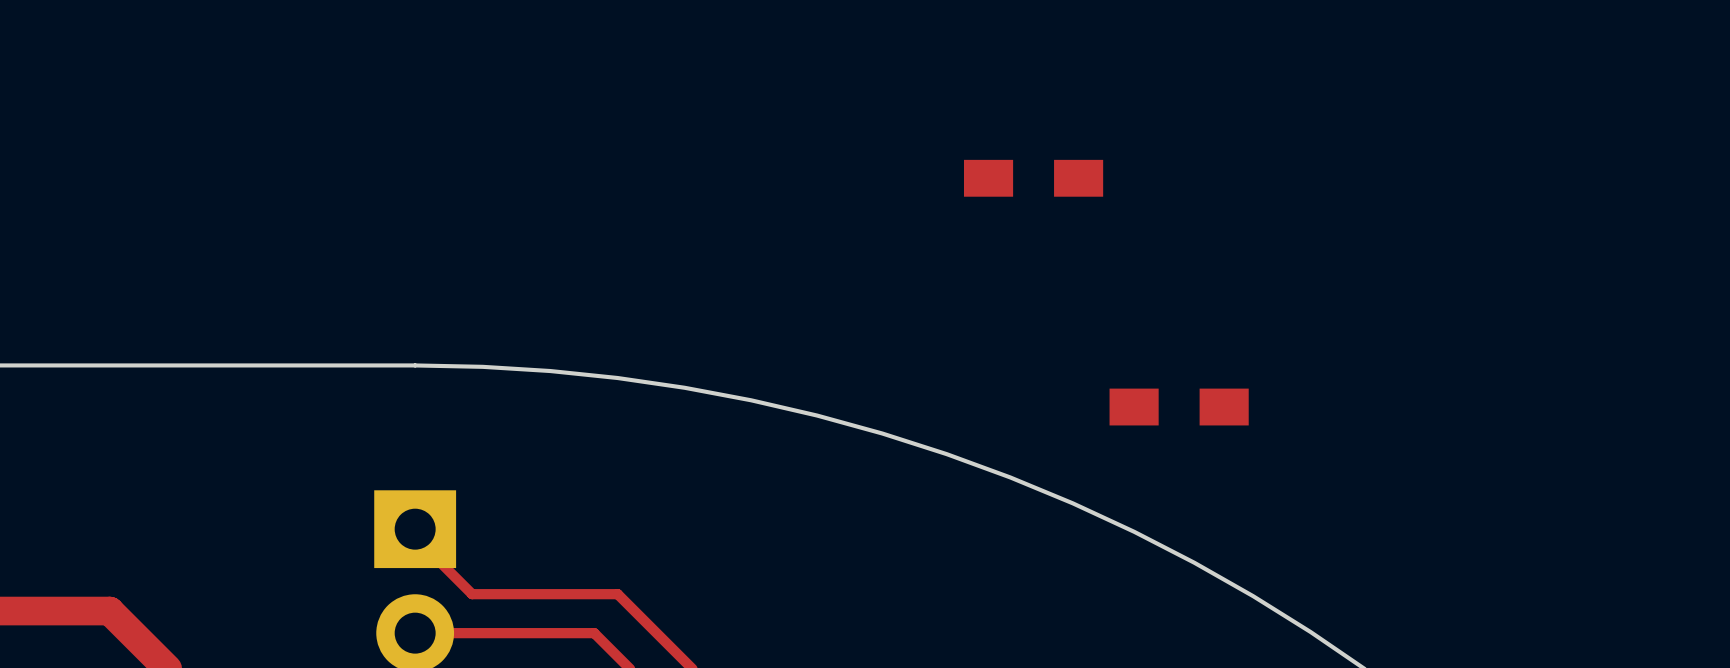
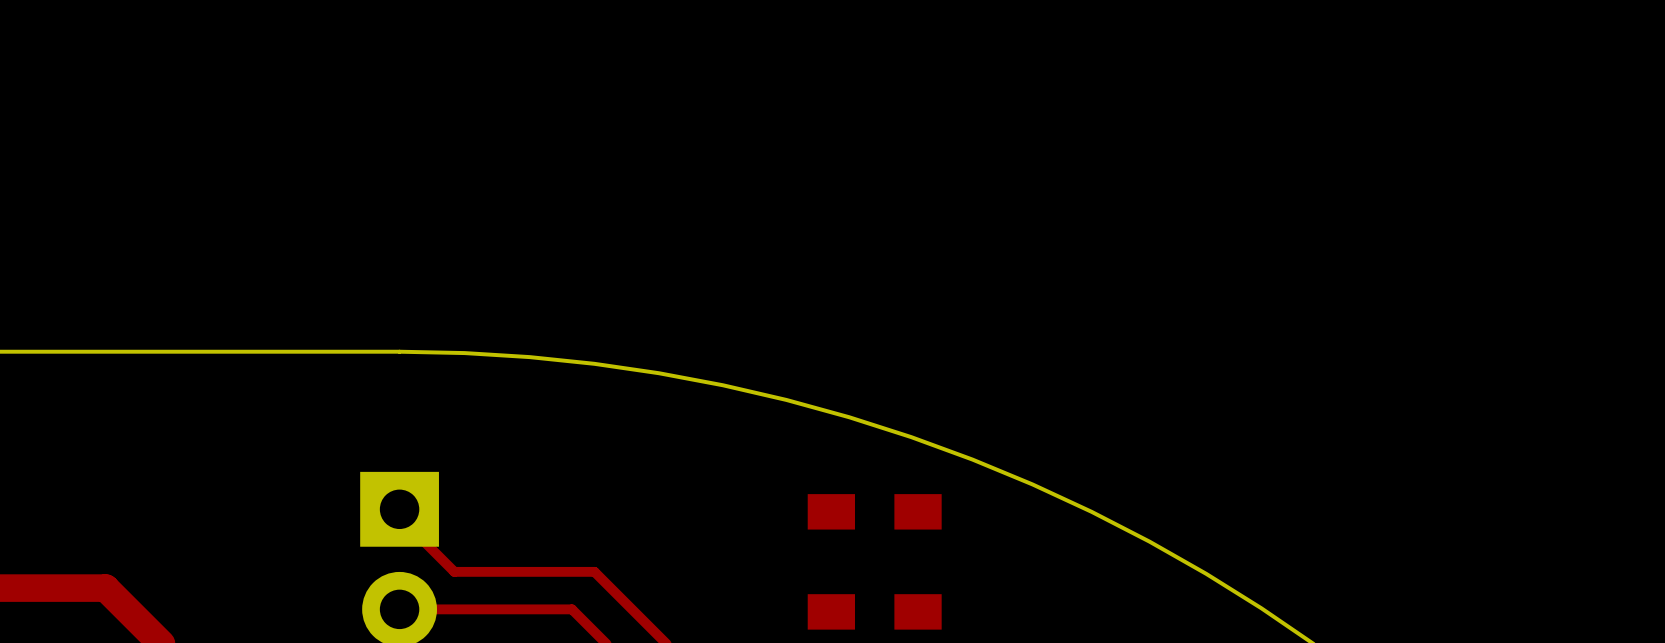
part: (1033, 178) -> none
part: (1179, 407) -> none
part: none -> (874, 511)
part: none -> (874, 611)

